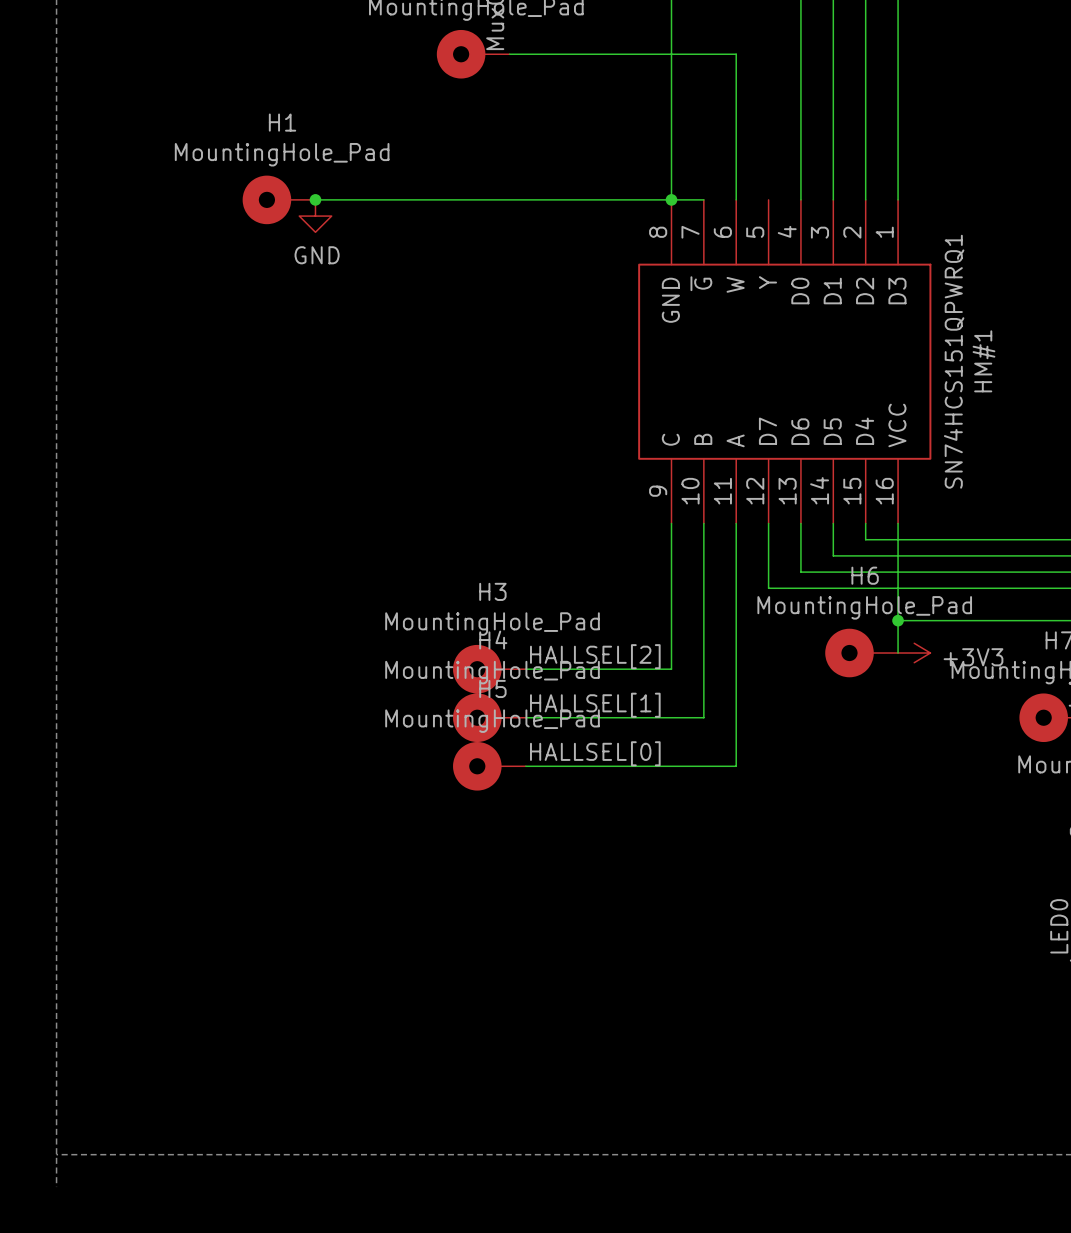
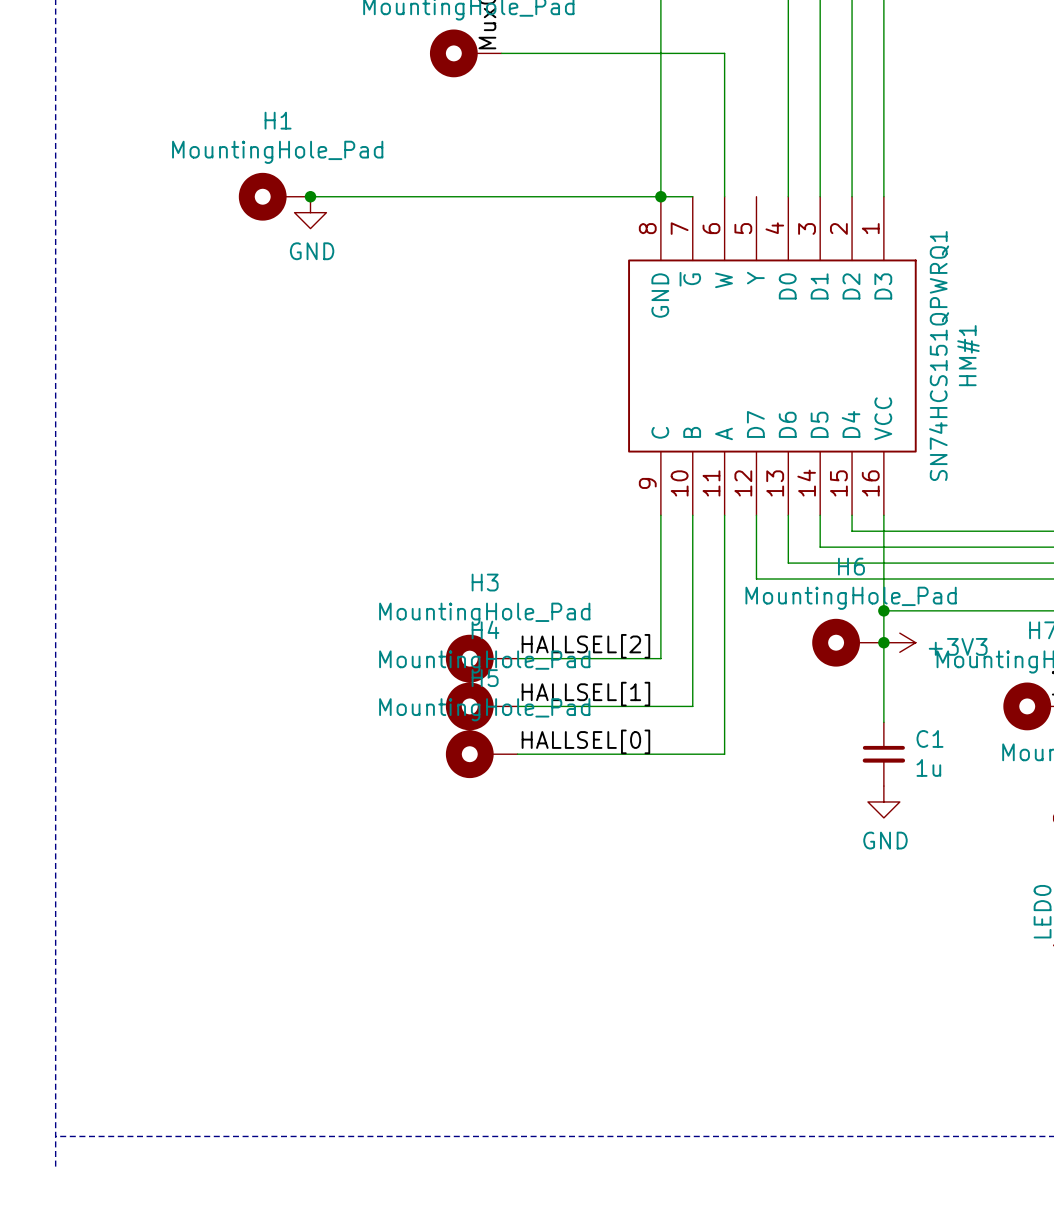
wire: none -> (883, 642) (883, 722)
junction: none -> (883, 642)
C1: none -> 1u (883, 754)
power symbol: none -> GND (883, 801)

